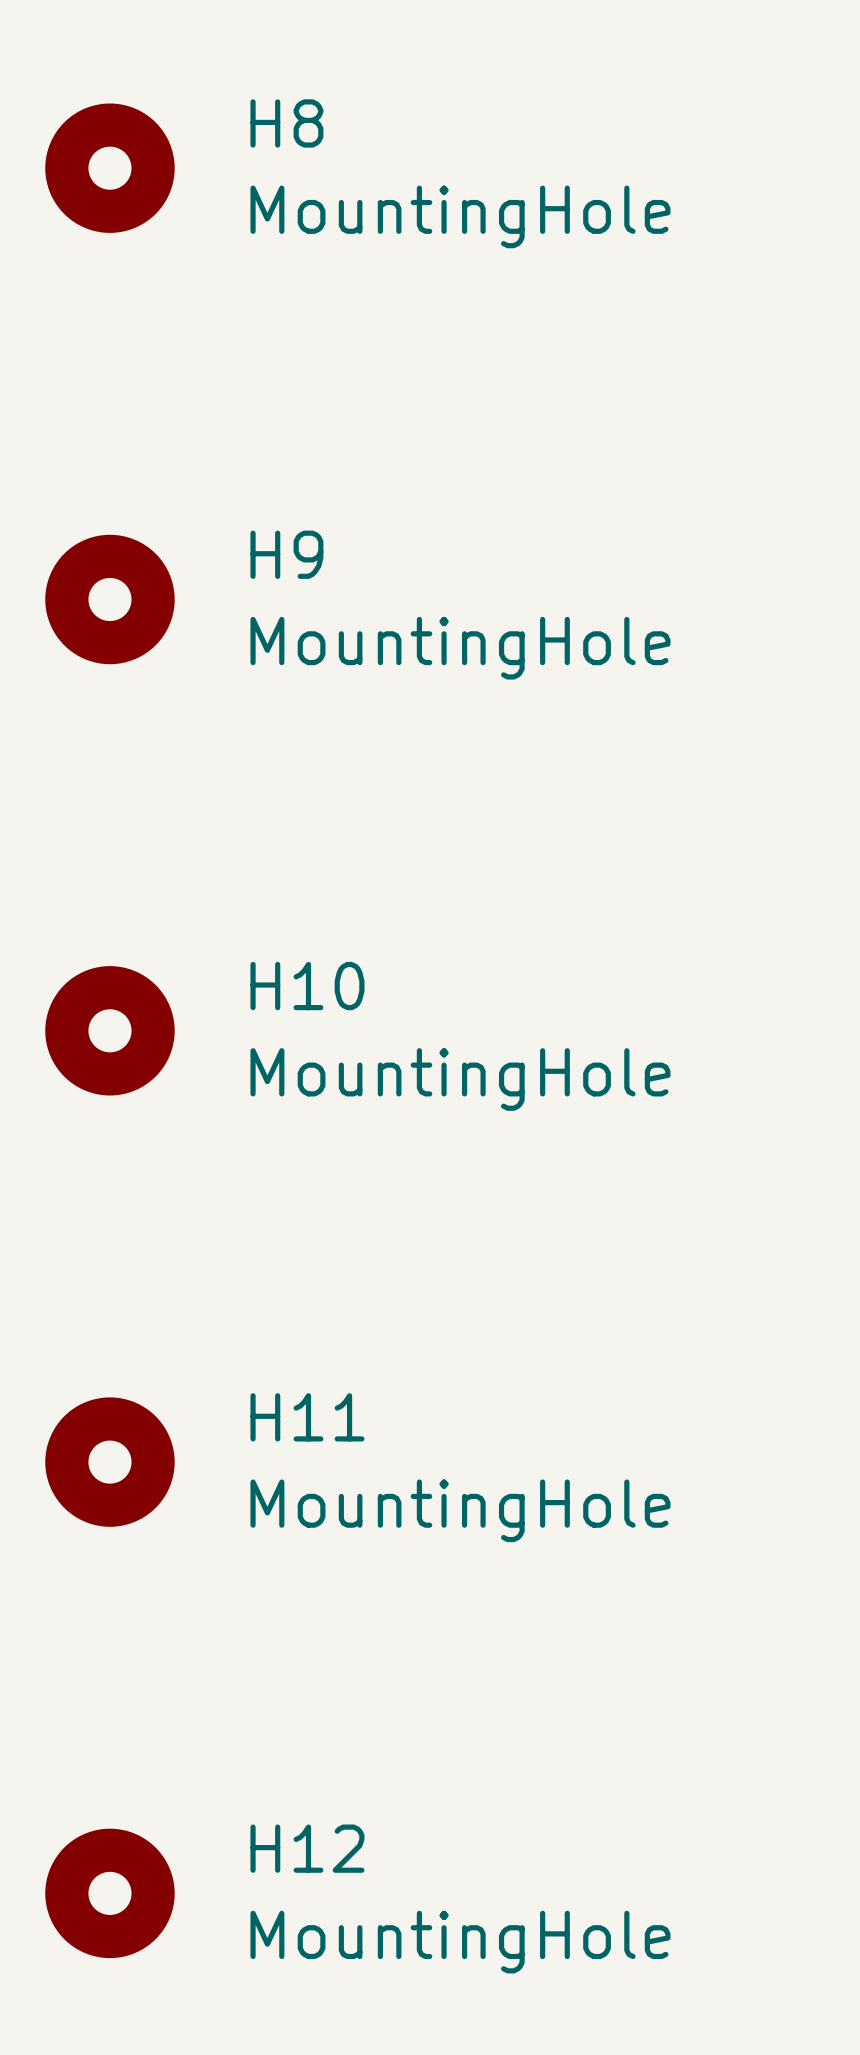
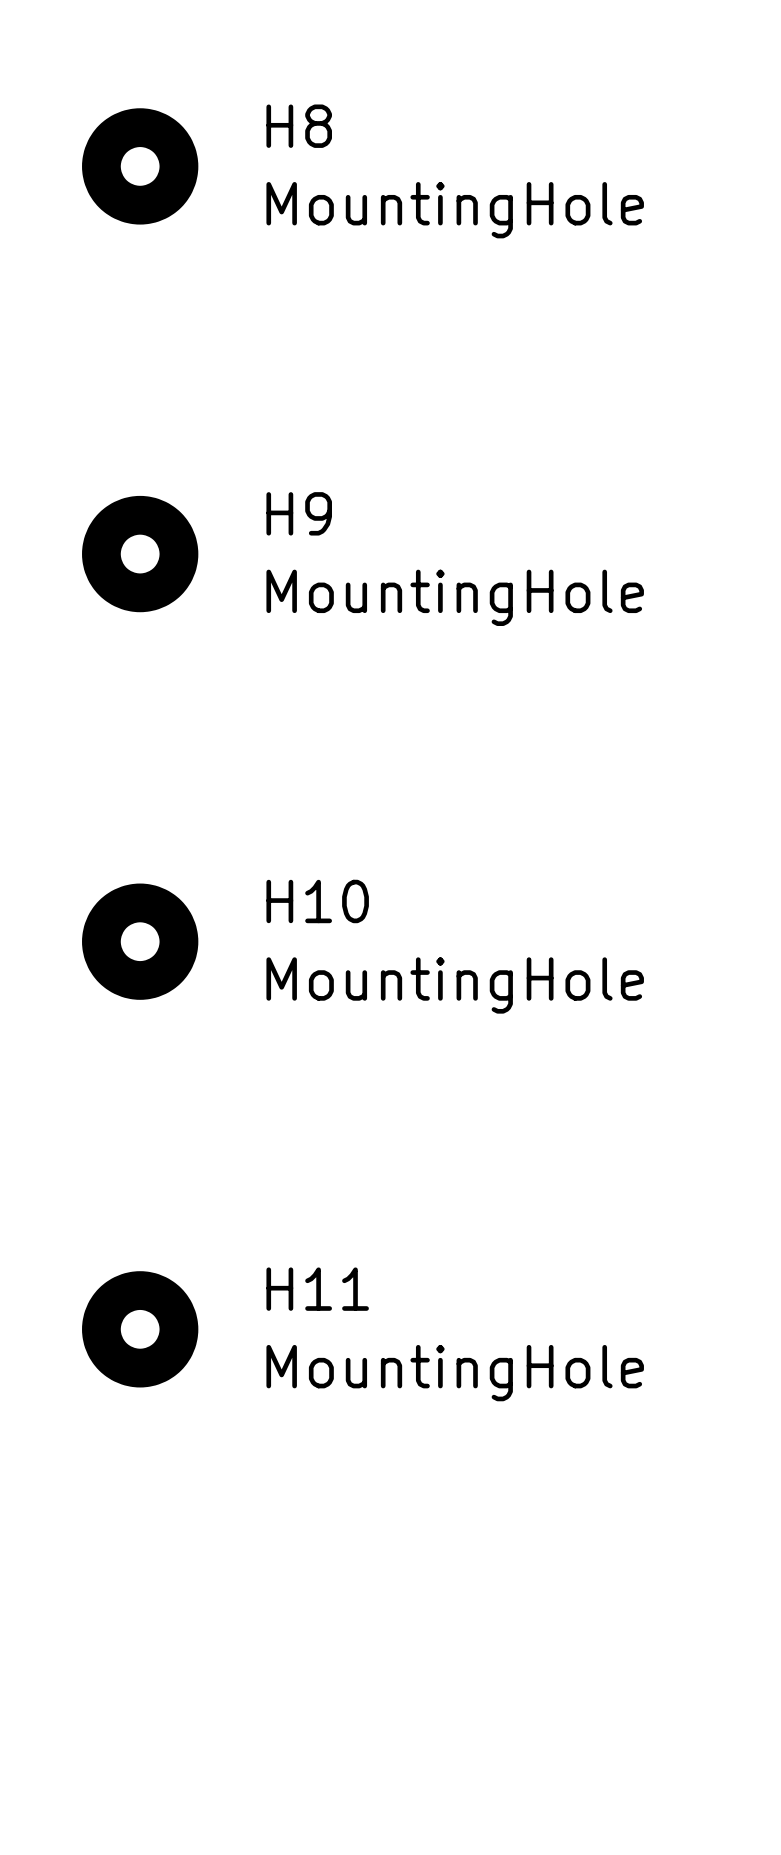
H12: MountingHole (109, 1893) -> none

